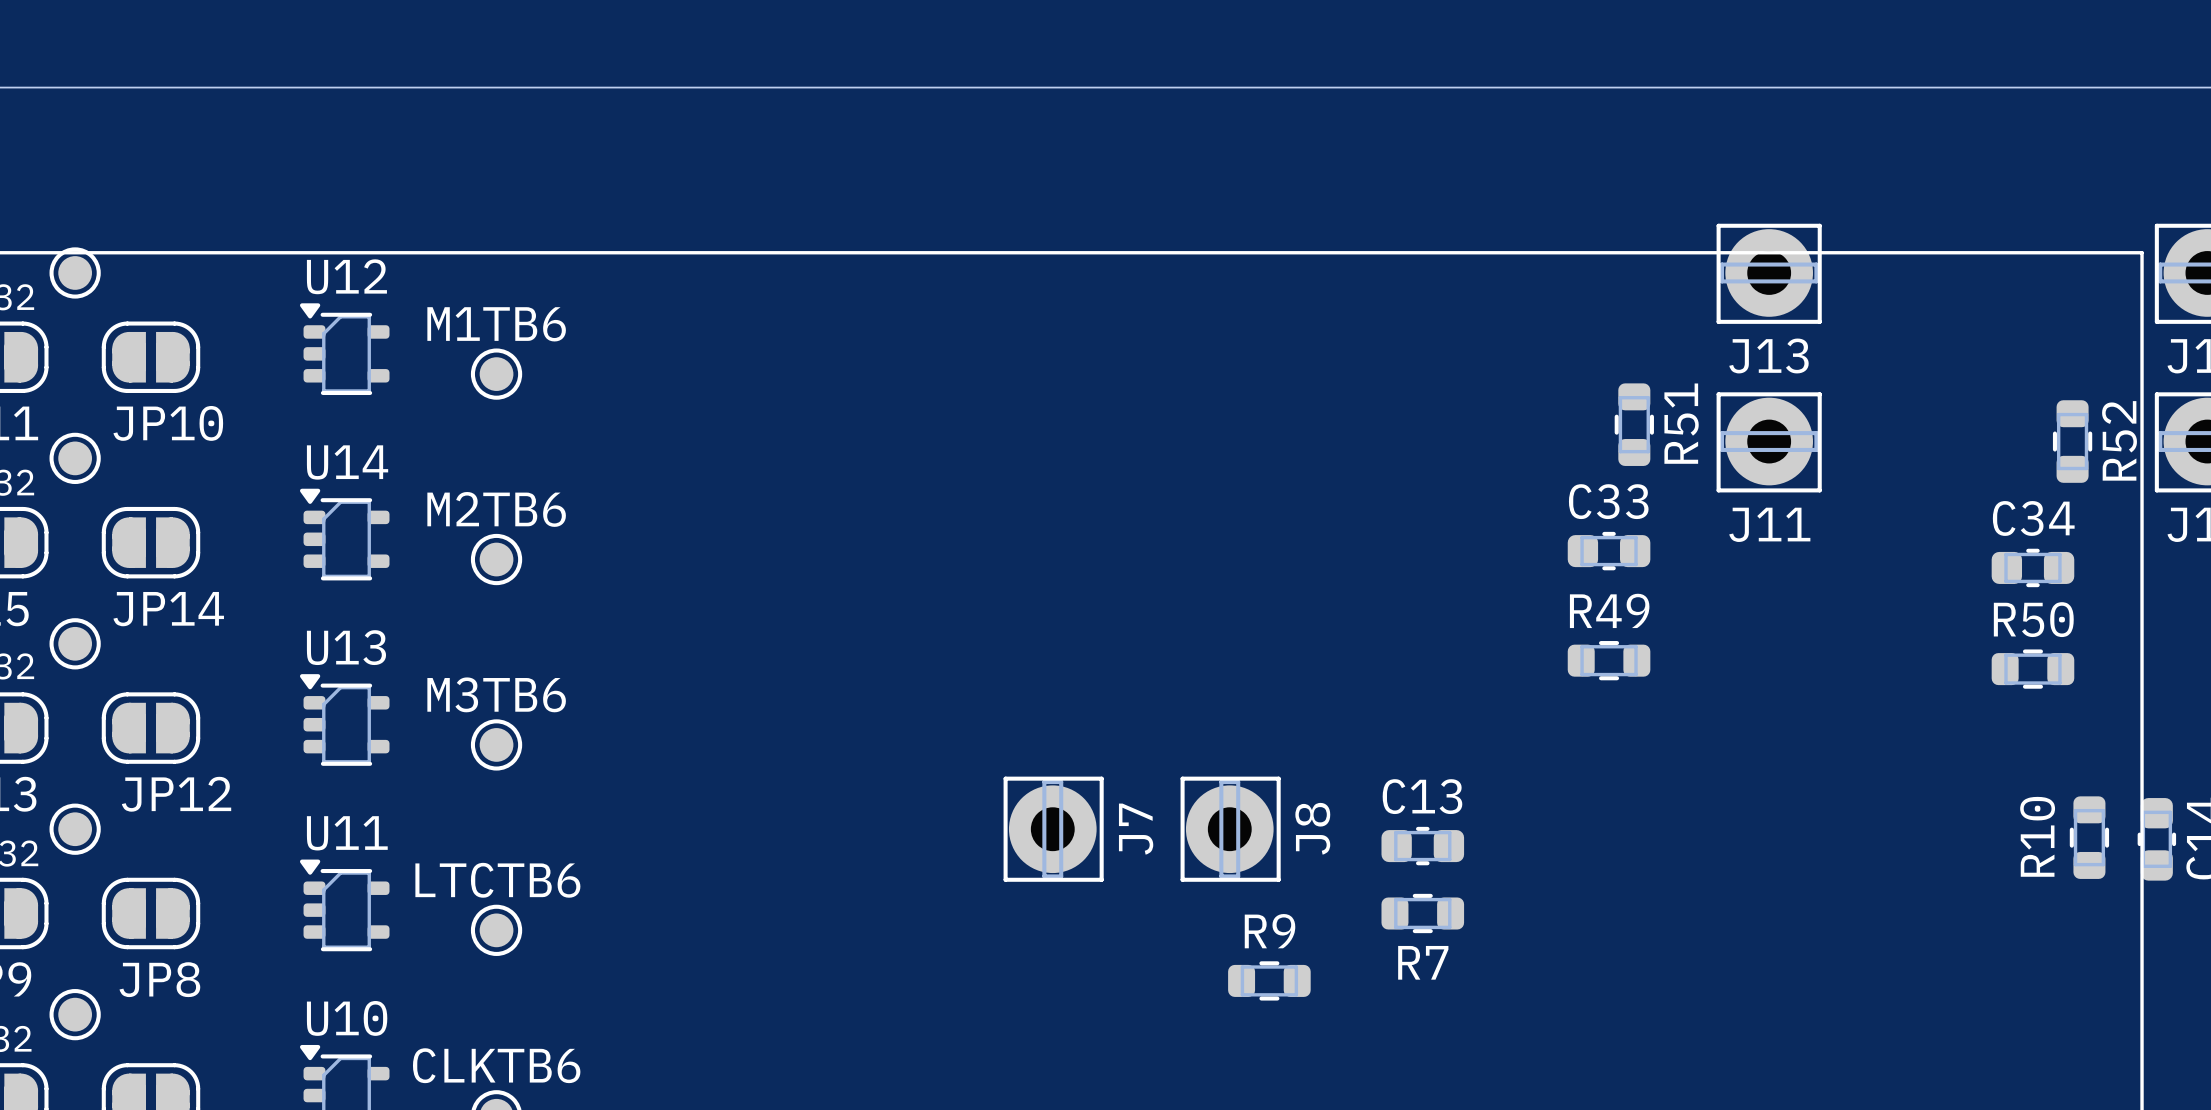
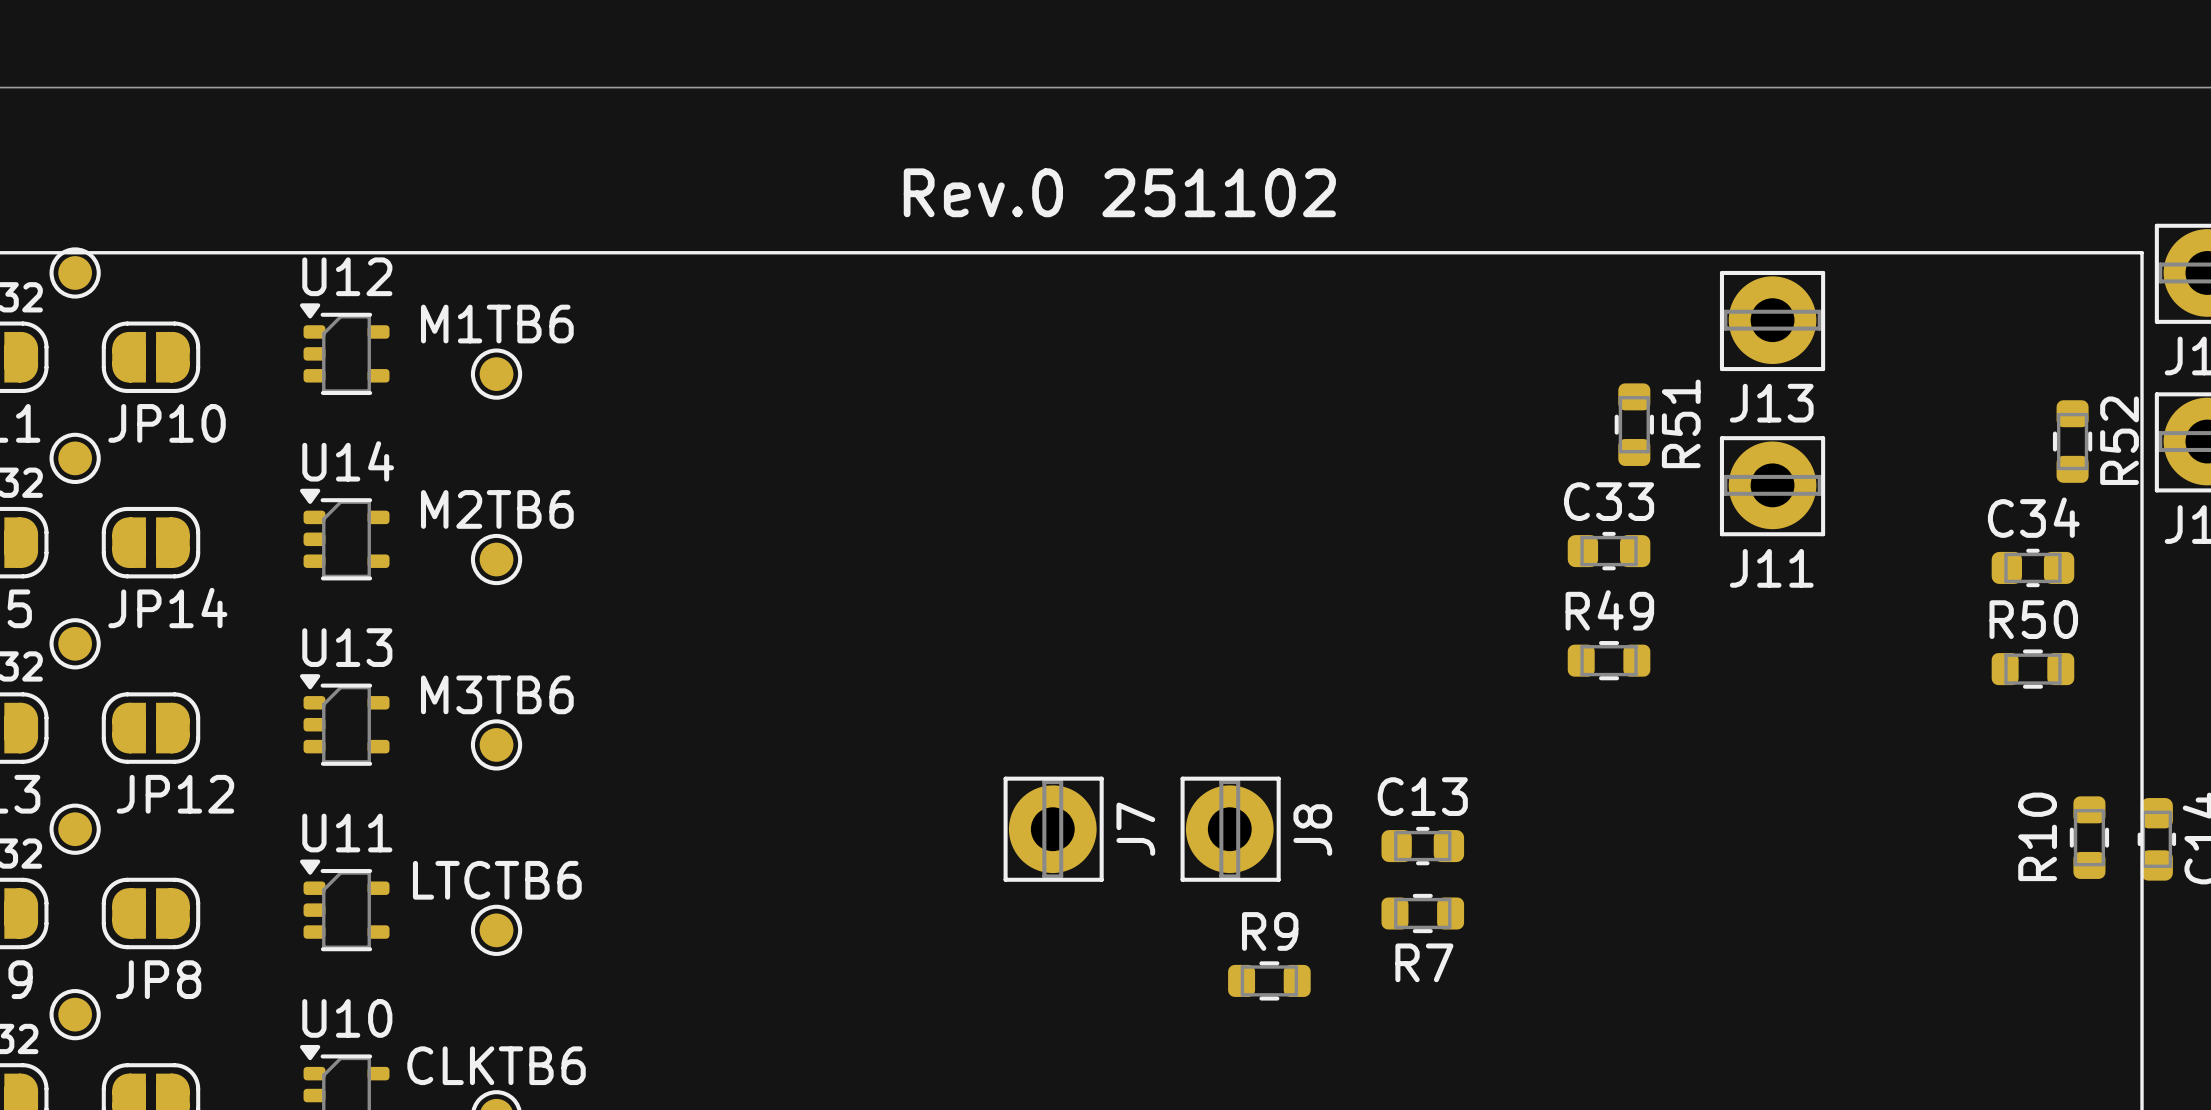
text: none -> Rev.0 251102 (1119, 192)
J13 position: (1769, 273) -> (1772, 321)
J11 position: (1769, 442) -> (1772, 486)

